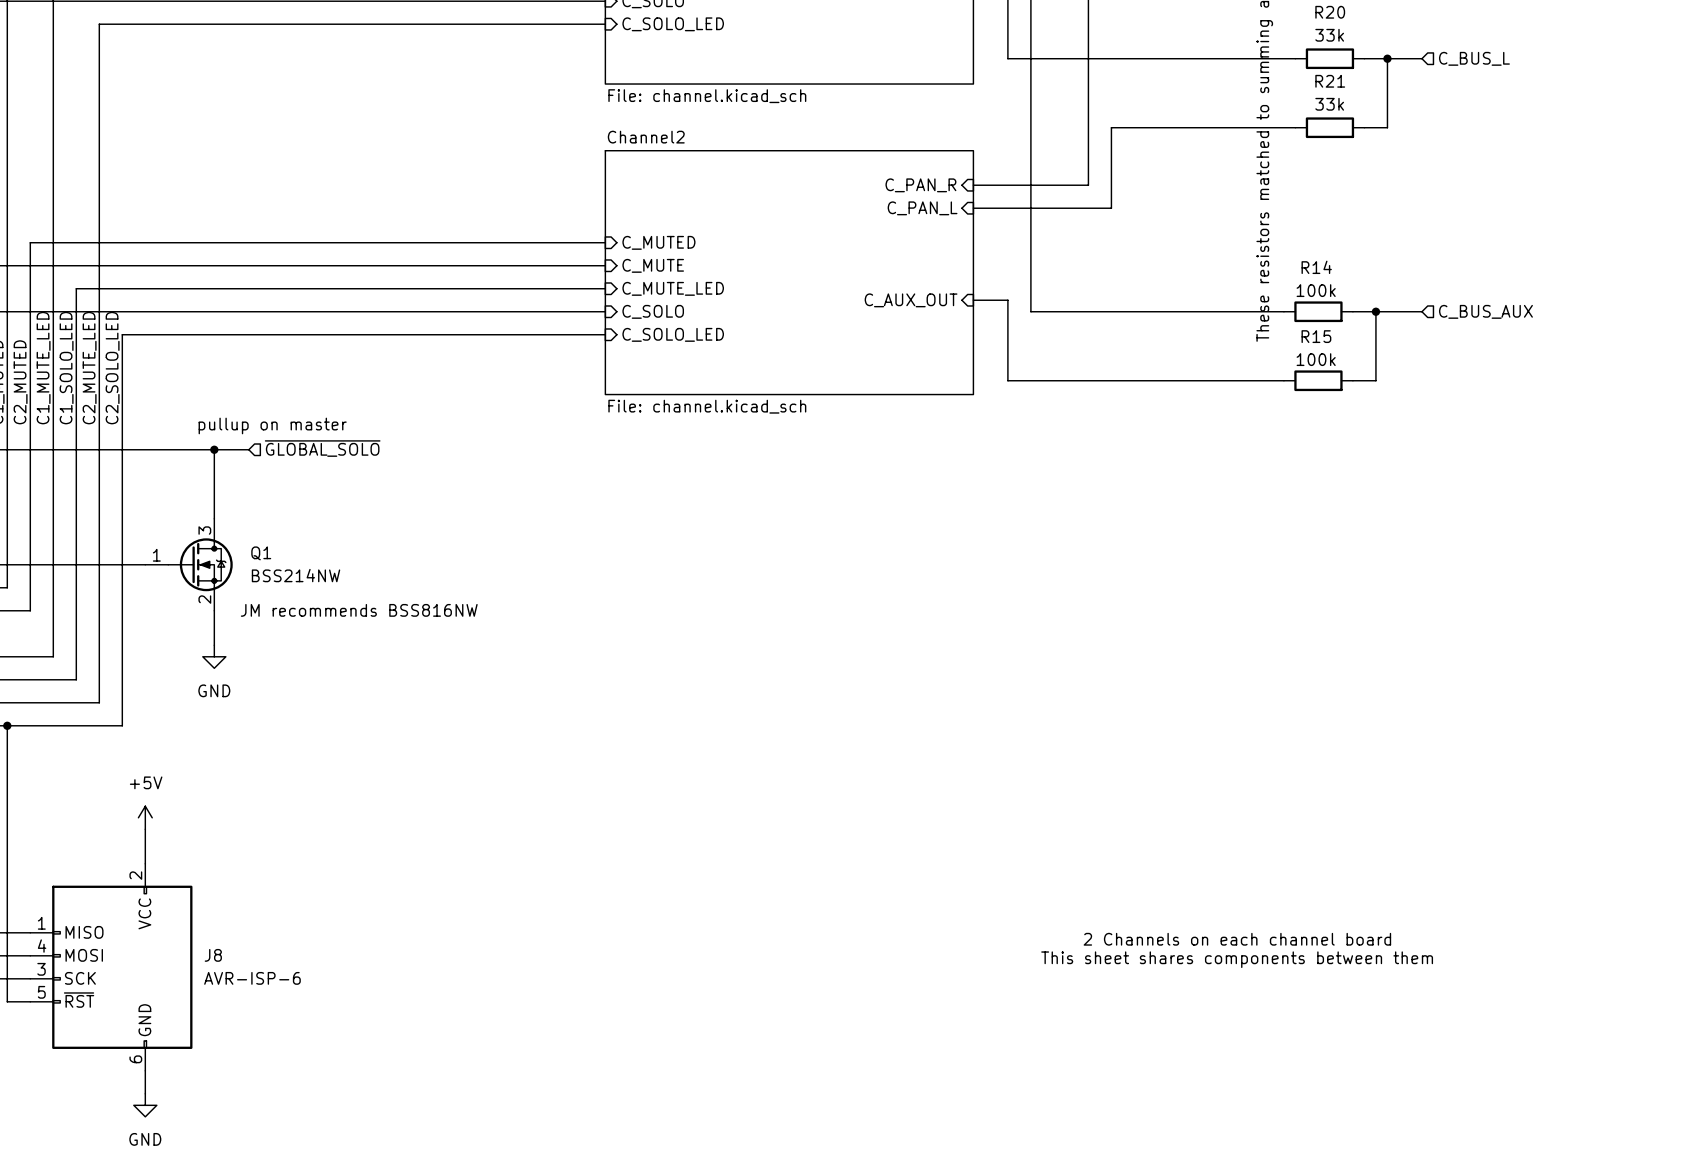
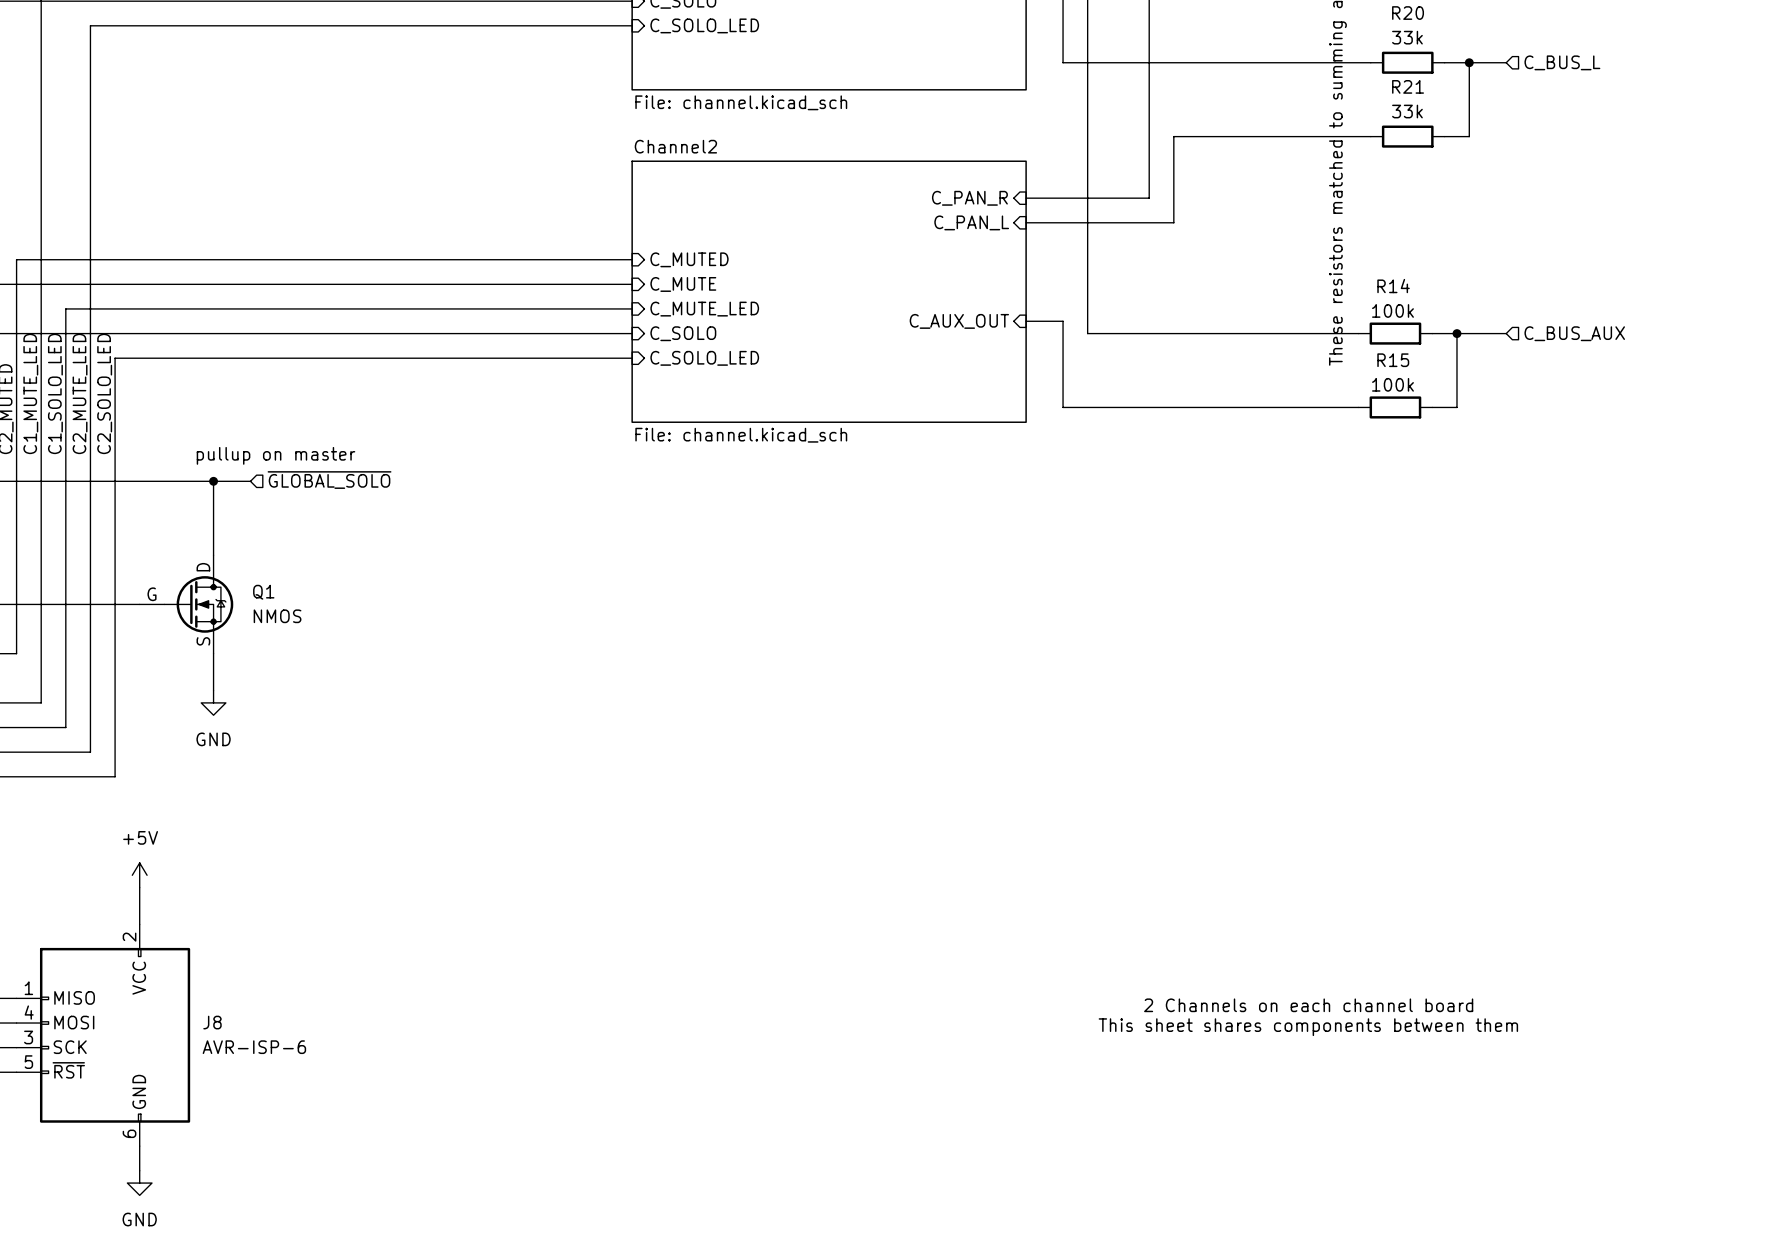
Q1 pin name: none -> D (203, 567)
Q1 pin number: 3 (204, 530) -> none
Q1 pin name: none -> G (152, 594)
Q1 pin number: 1 (156, 555) -> none
Q1 value: BSS214NW (296, 575) -> NMOS (277, 616)
Q1 pin name: none -> S (203, 641)
Q1 pin number: 2 (204, 599) -> none
text: JM recommends BSS816NW (359, 610) -> none

